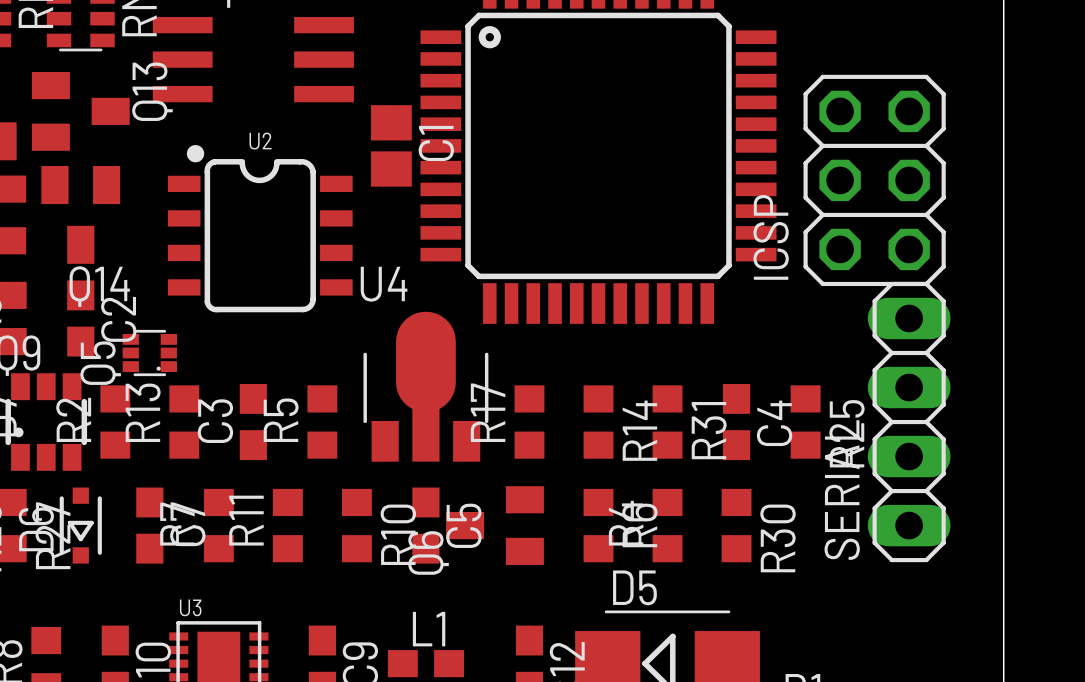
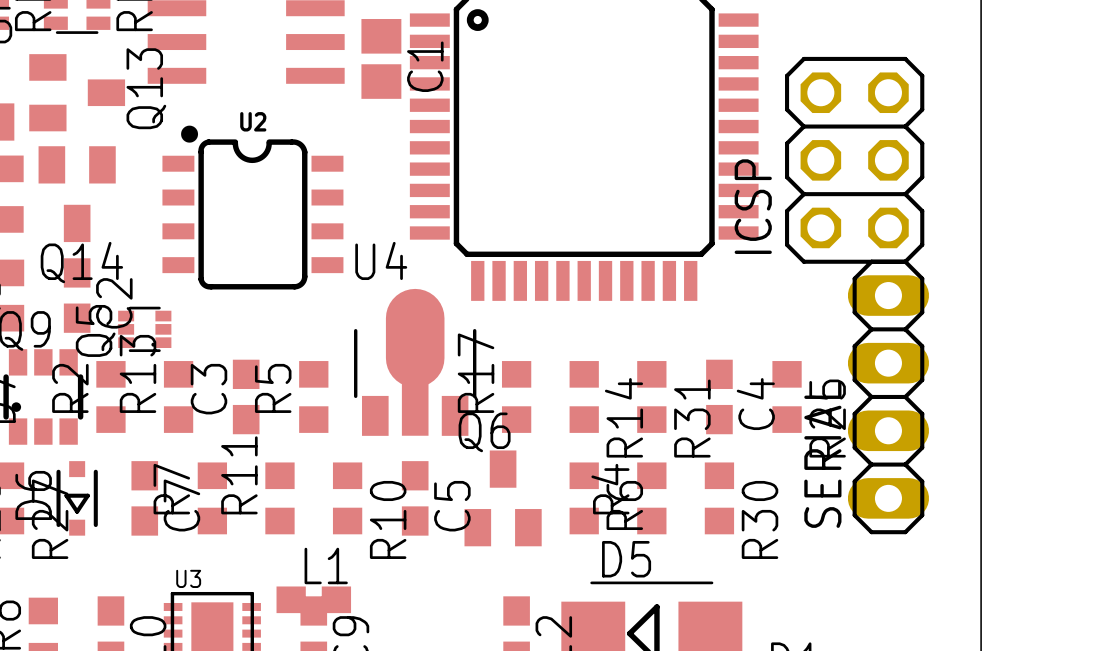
C1 position: (391, 145) -> (381, 58)
Q6 rotation: 0° (494, 525) -> 90° clockwise (503, 498)
L1 position: (425, 663) -> (313, 599)

